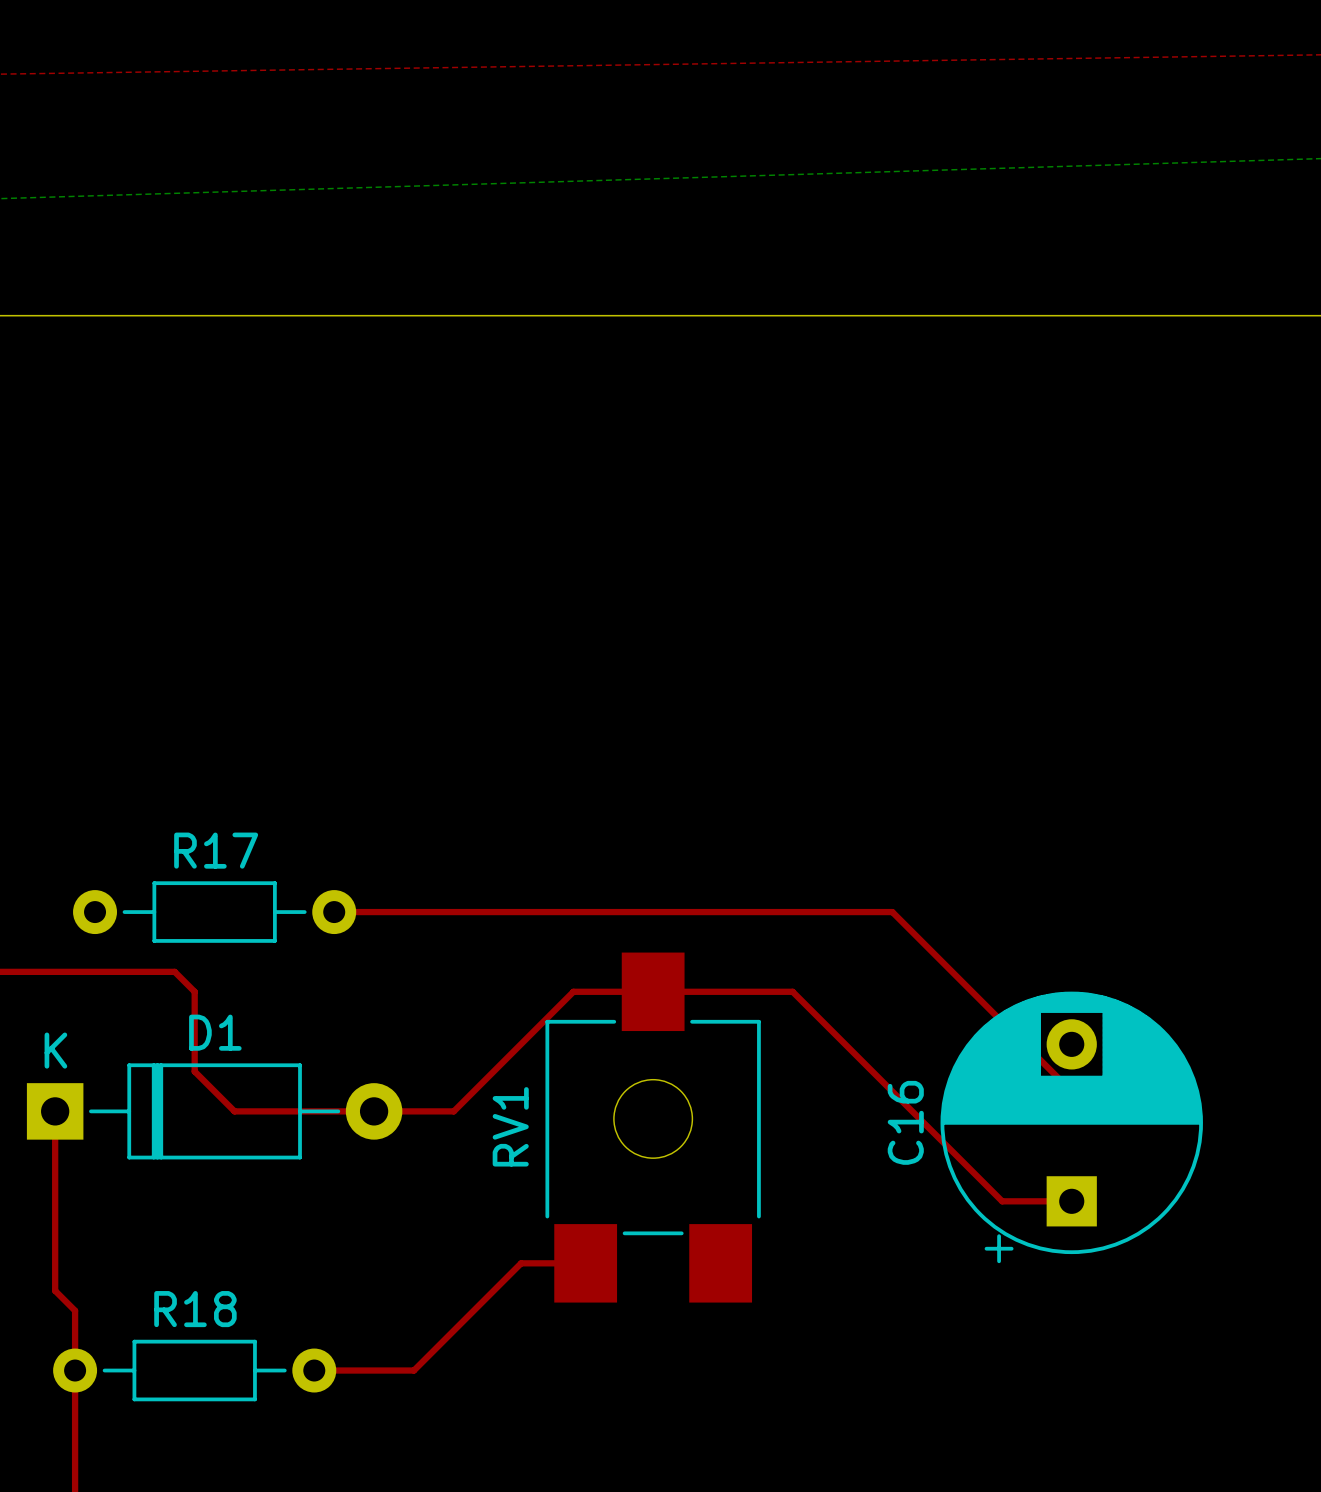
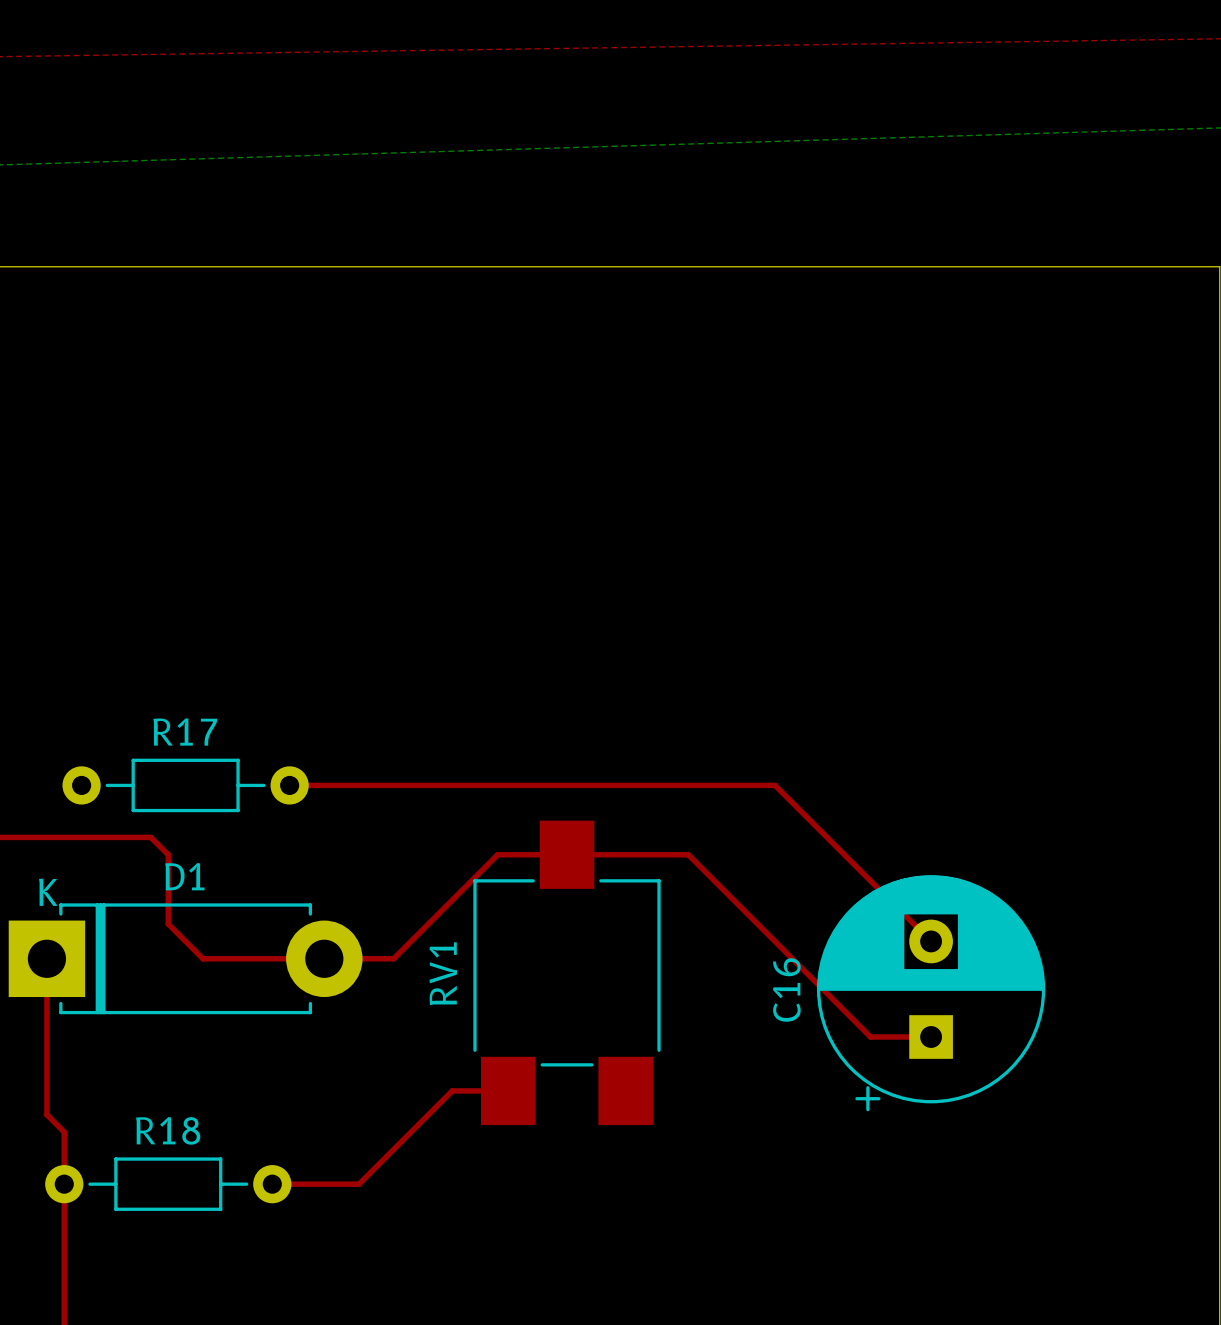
RV1 footprint: [545, 952, 761, 1303] -> [473, 820, 661, 1126]
C16 footprint: [940, 991, 1203, 1264] -> [816, 875, 1046, 1112]
D1 footprint: [26, 1063, 403, 1160] -> [8, 903, 363, 1015]

